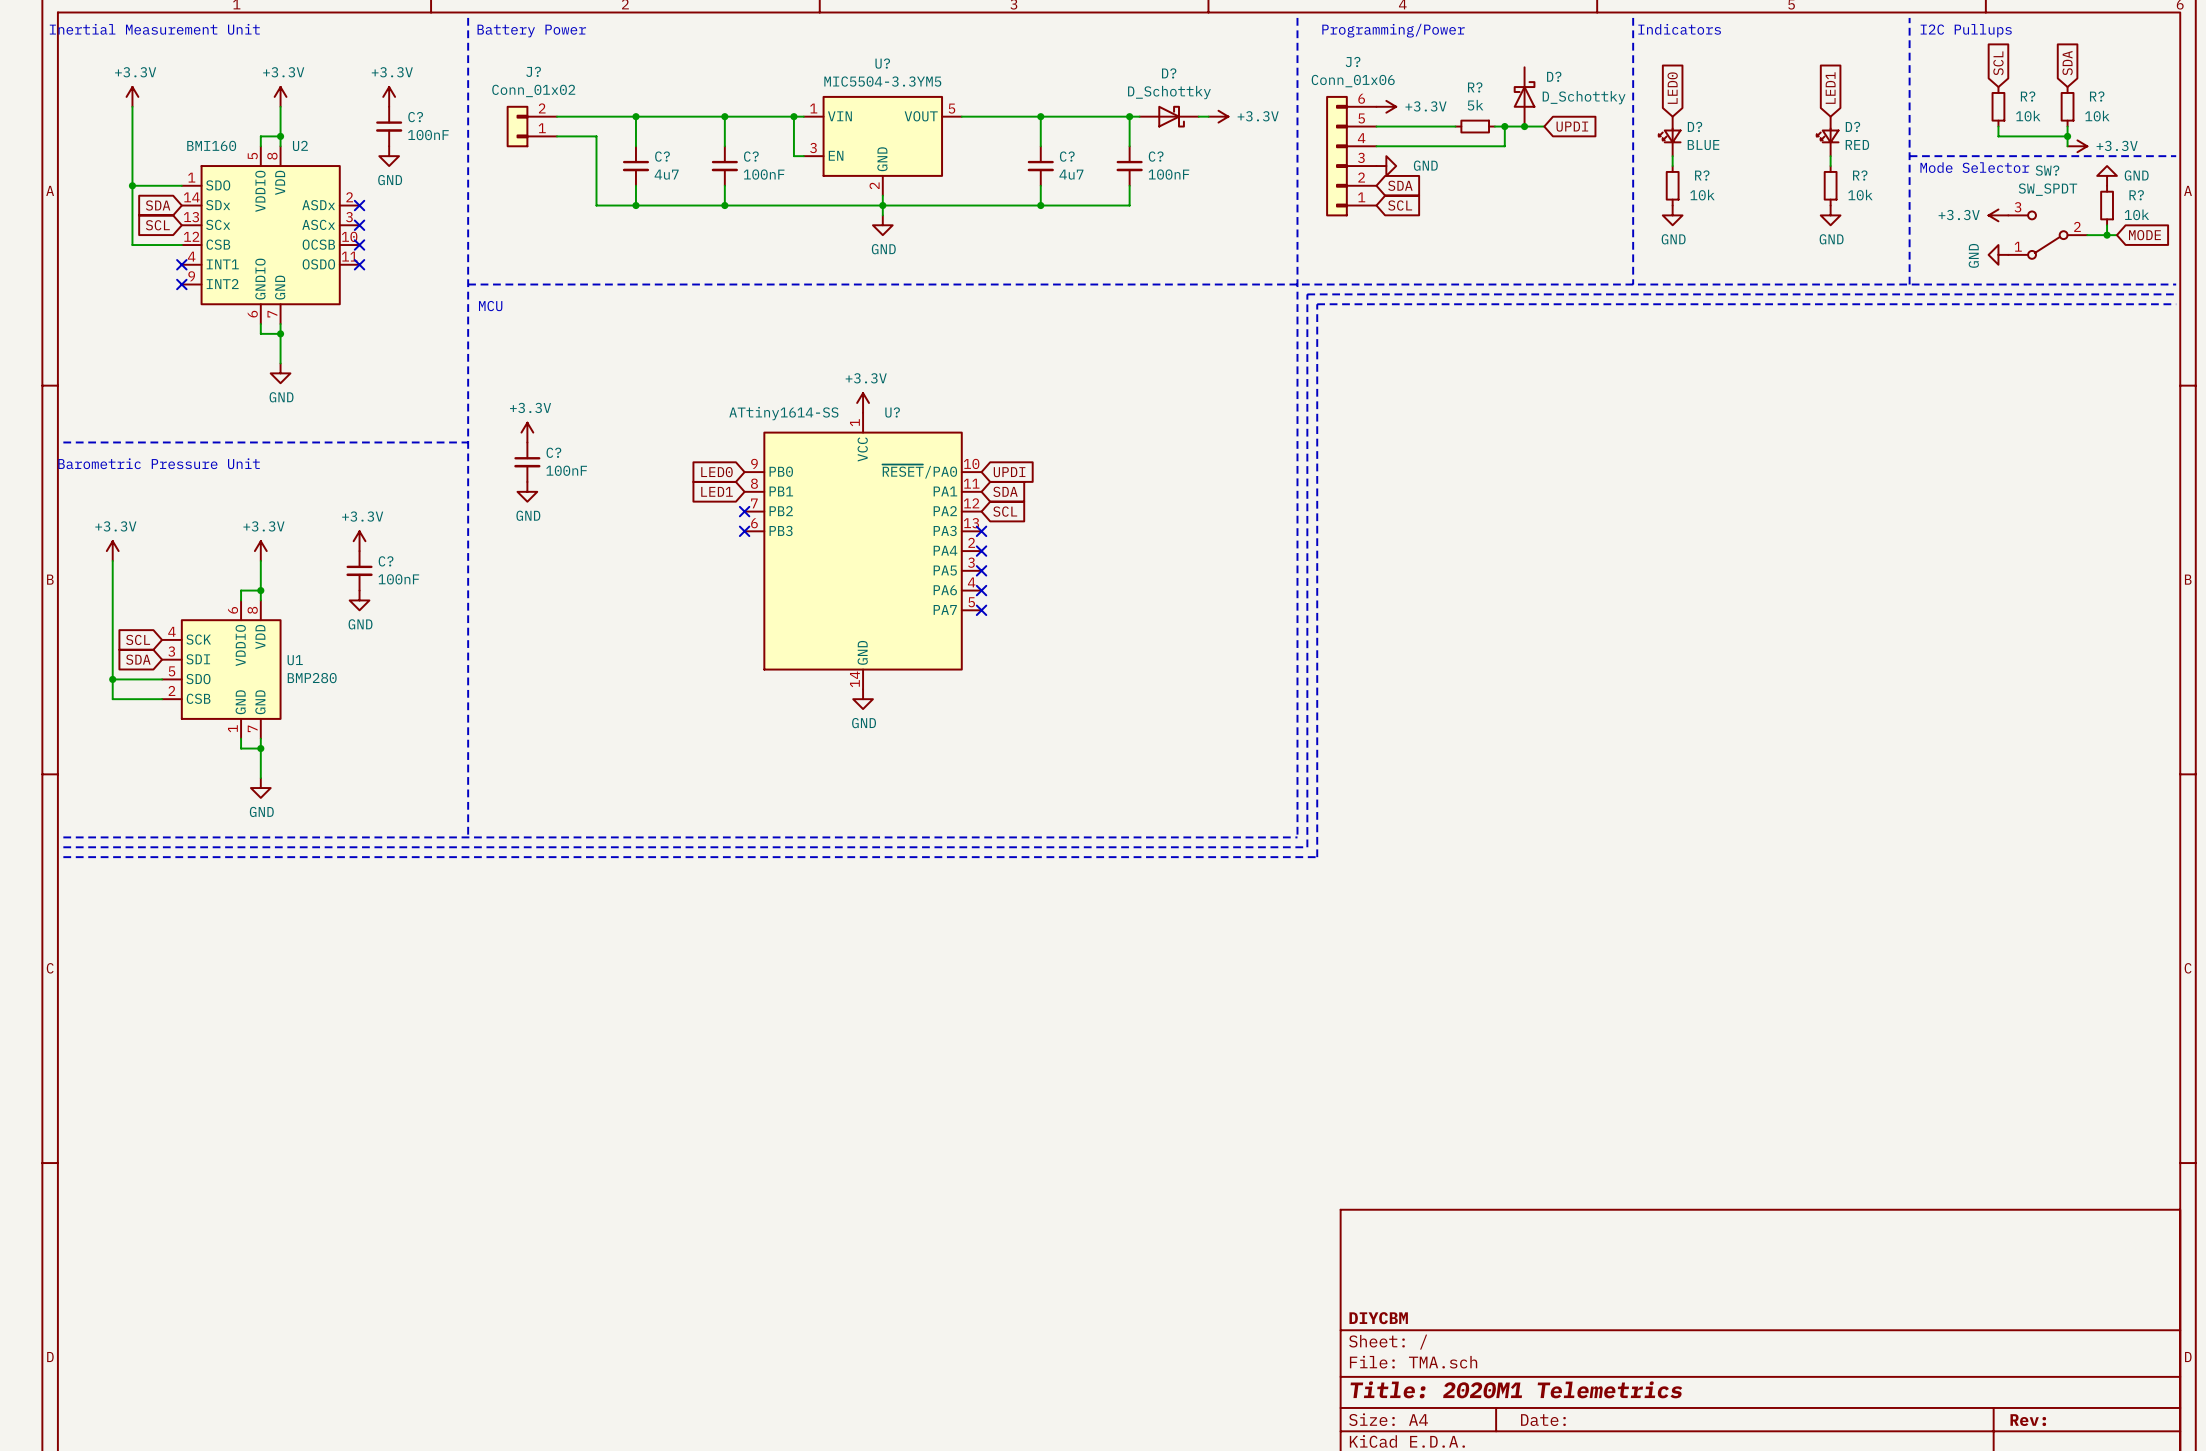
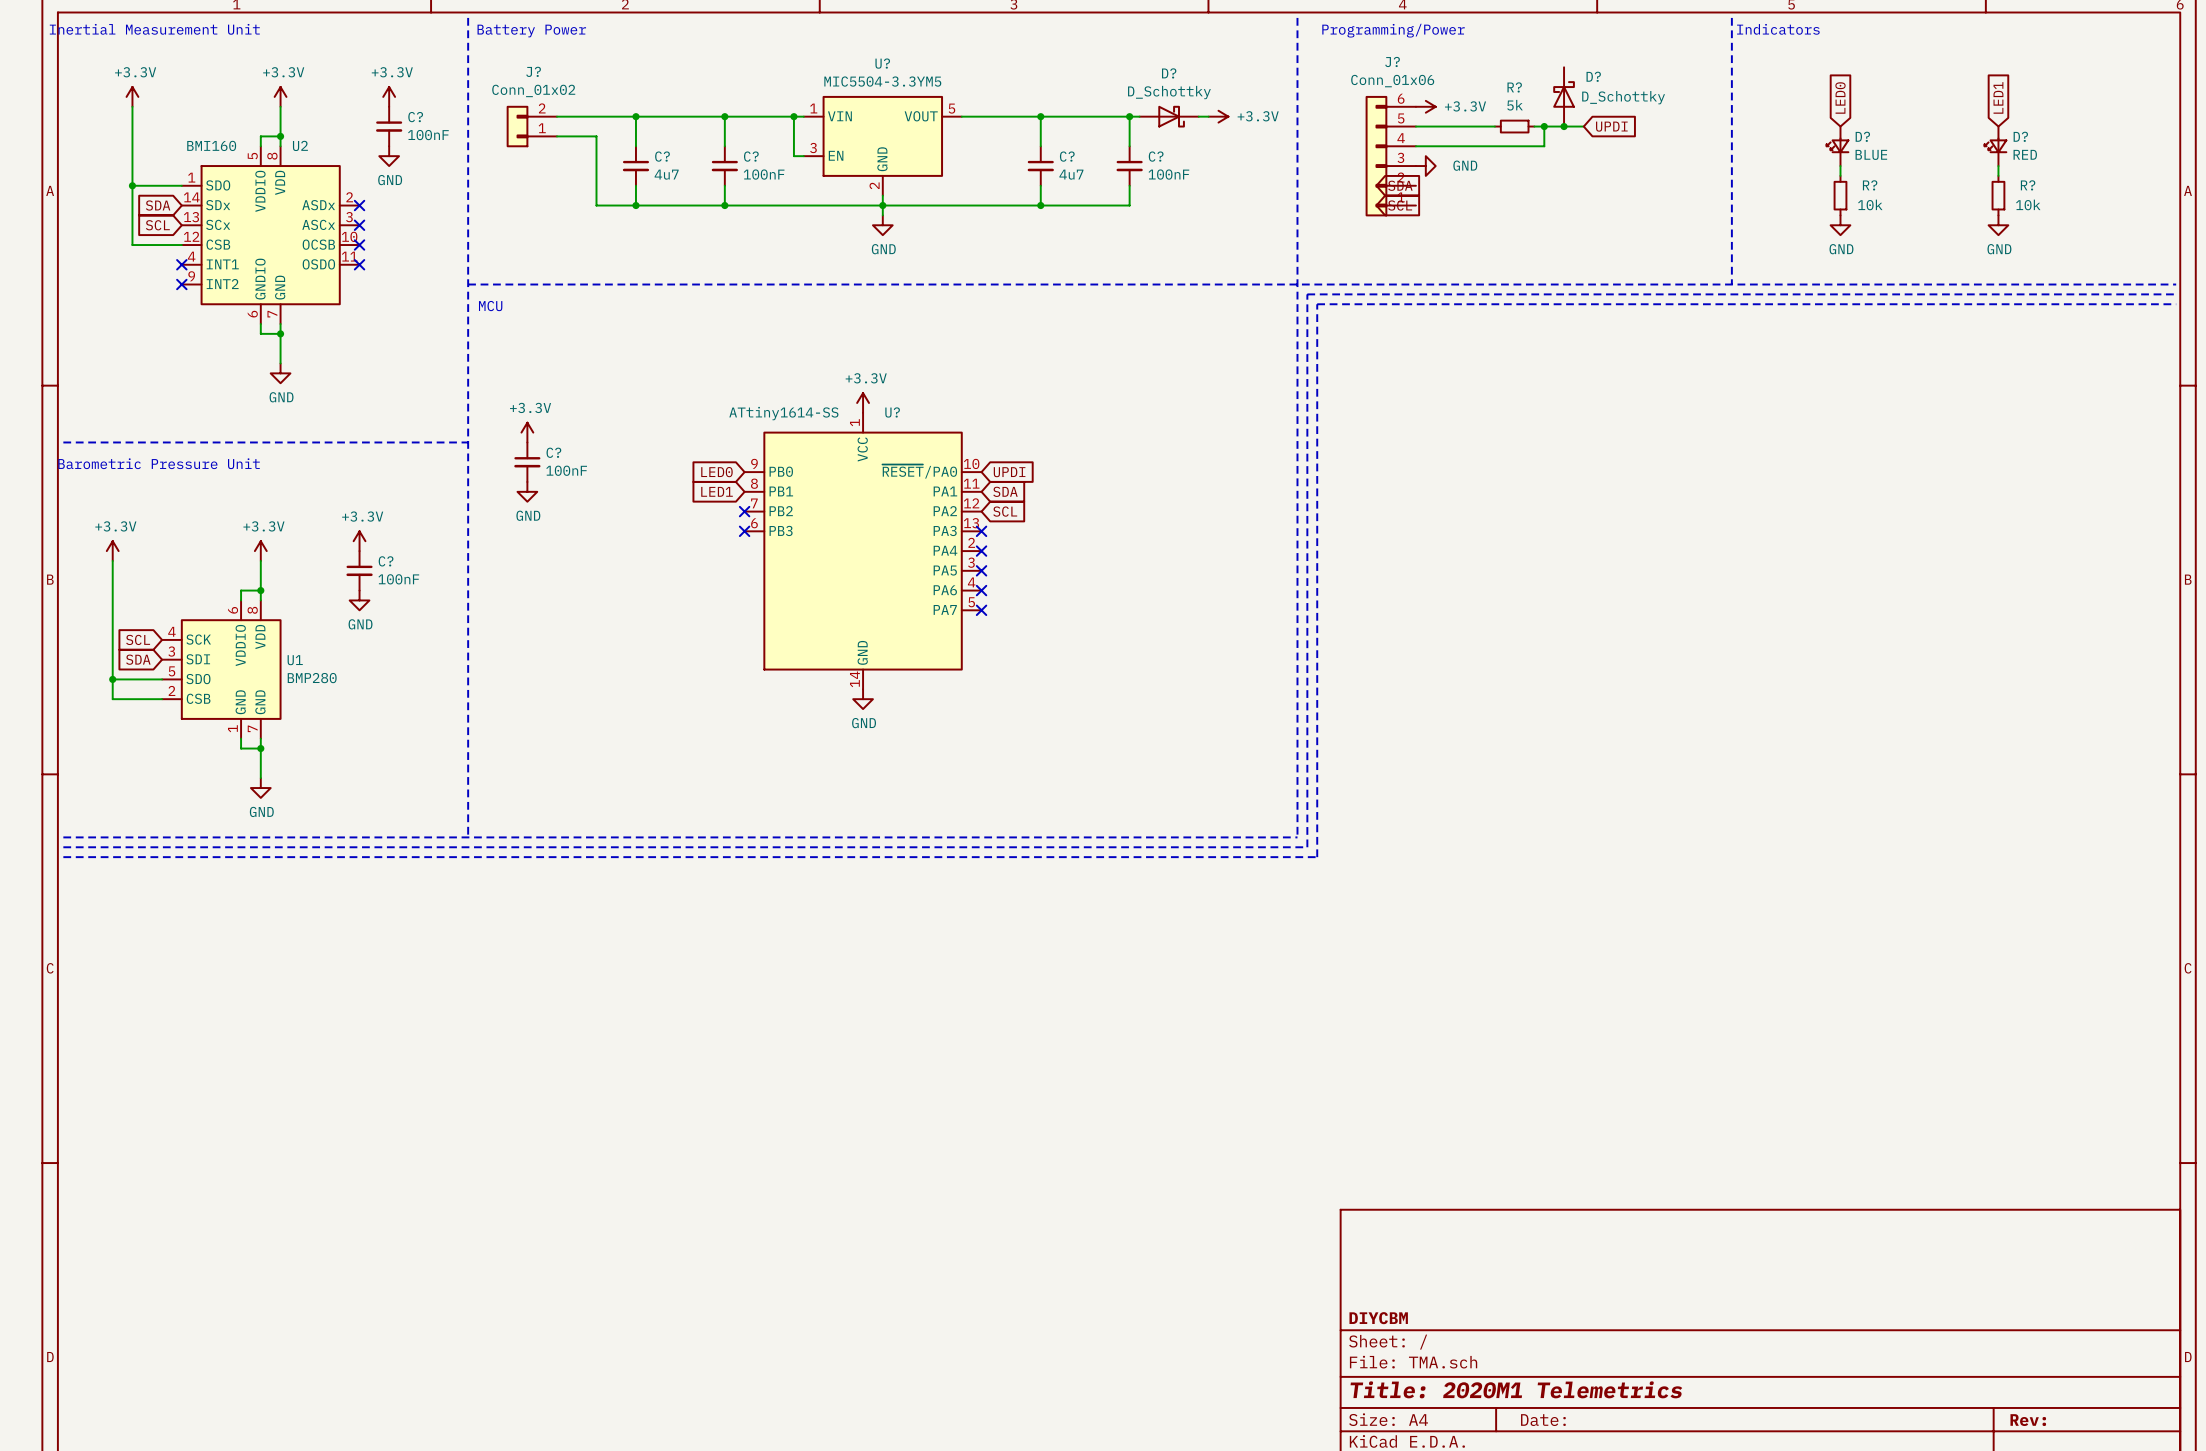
line: (1633, 17) (1633, 284) -> (1731, 17) (1731, 284)
line: (1909, 17) (1909, 284) -> none
text position: Indicators (1679, 29) -> Indicators (1778, 29)
text: I2C Pullups (1966, 30) -> none
global label: SCL (1998, 63) -> none
global label: SDA (2067, 63) -> none
global label position: LED0 (1672, 88) -> LED0 (1840, 98)
global label position: LED1 (1830, 88) -> LED1 (1998, 97)
D? position: (1524, 96) -> (1564, 96)
power symbol position: +3.3V (1386, 106) -> +3.3V (1425, 106)
R?: 10k (1998, 106) -> none
R?: 10k (2067, 106) -> none
R? position: (1475, 126) -> (1514, 126)
wire: (1494, 126) (1534, 126) -> (1494, 126) (1455, 126)
wire: (1504, 126) (1504, 146) -> (1583, 126) (1544, 126) (1544, 146) (1504, 146)
junction: (1504, 126) -> none
junction: (1524, 126) -> none
junction: none -> (1544, 126)
junction: none -> (1564, 126)
global label position: UPDI (1572, 126) -> UPDI (1611, 126)
wire: (1998, 126) (1998, 136) (2067, 136) -> none
wire: (2067, 126) (2067, 146) -> none
D? position: (1670, 136) -> (1838, 146)
D? position: (1828, 136) -> (1995, 146)
junction: (2067, 136) -> none
power symbol: +3.3V (2077, 146) -> none
J? position: (1351, 156) -> (1390, 156)
wire: (1672, 156) (1672, 166) -> (1840, 166) (1840, 175)
wire: (1830, 156) (1830, 166) -> (1998, 166) (1998, 175)
line: (1909, 156) (2176, 156) -> none
power symbol position: GND (1386, 166) -> GND (1425, 166)
text: Mode Selector (1974, 167) -> none
power symbol: GND (2107, 175) -> none
R?: 10k (1672, 185) -> none
R? position: (1830, 185) -> (1840, 195)
R?: none -> 10k (1998, 195)
R?: 10k (2107, 205) -> none
power symbol: GND (1672, 215) -> none
power symbol position: GND (1830, 215) -> GND (1840, 225)
power symbol: +3.3V (1998, 215) -> none
wire: (2107, 225) (2107, 235) -> none
SW?: SW_SPDT (2047, 235) -> none
wire: (2087, 235) (2116, 235) -> none
junction: (2107, 235) -> none
global label: MODE (2144, 235) -> none
power symbol rotation: 0° (1998, 254) -> 90° counterclockwise (1998, 225)
power symbol position: GND (1998, 254) -> GND (1998, 225)

